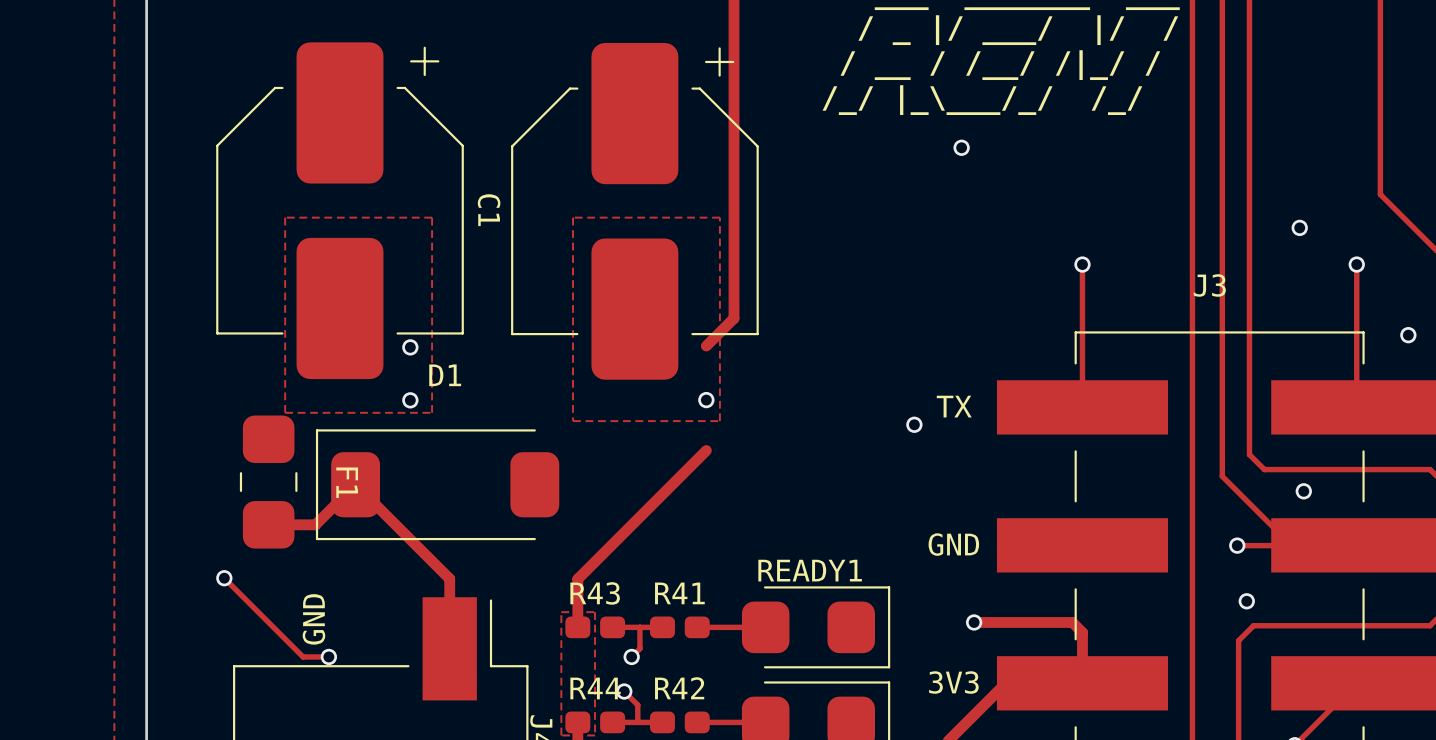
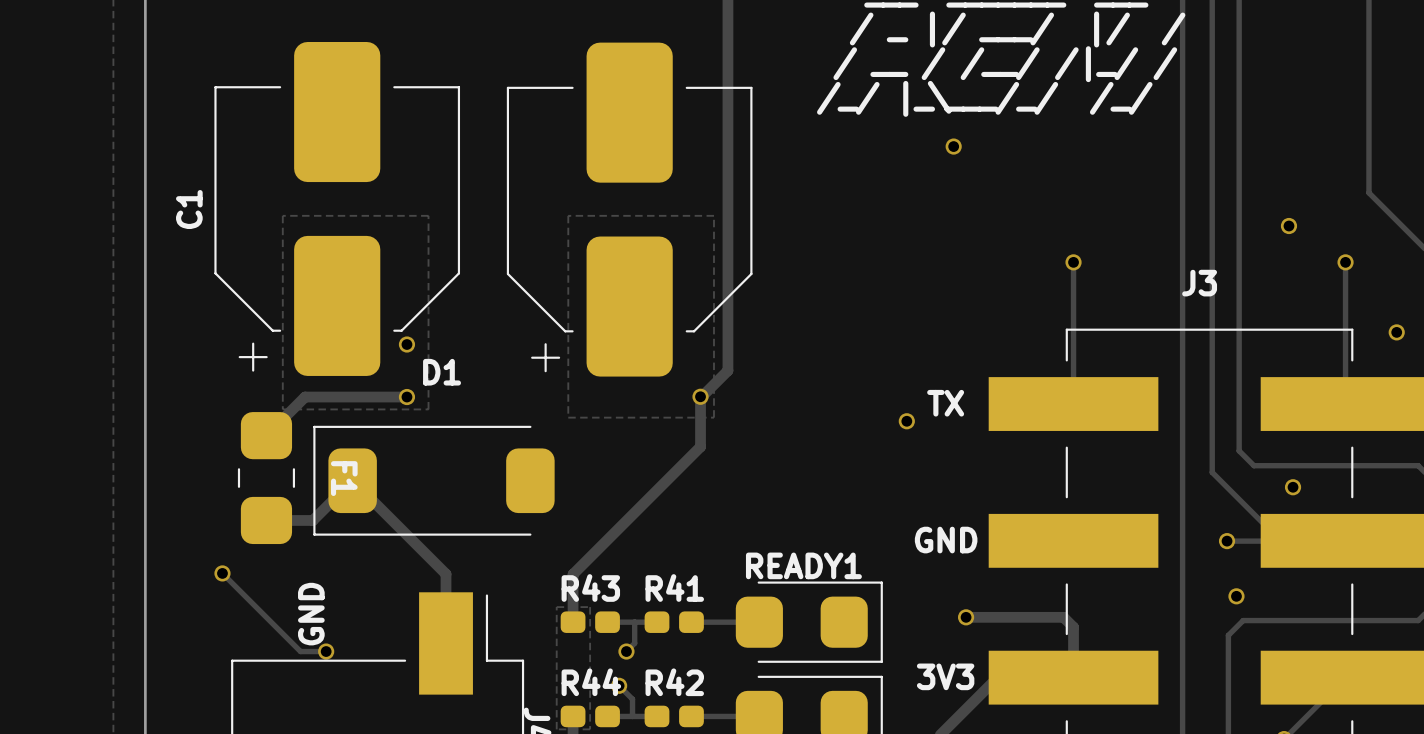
C1 rotation: 0° (340, 210) -> 180° (337, 208)
part rotation: 0° (634, 211) -> 180° (629, 209)
track: (734, 318) (706, 346) -> (727, 315) (727, 370) (700, 396) (700, 446)
track: none -> (406, 397) (305, 397) (266, 435)

